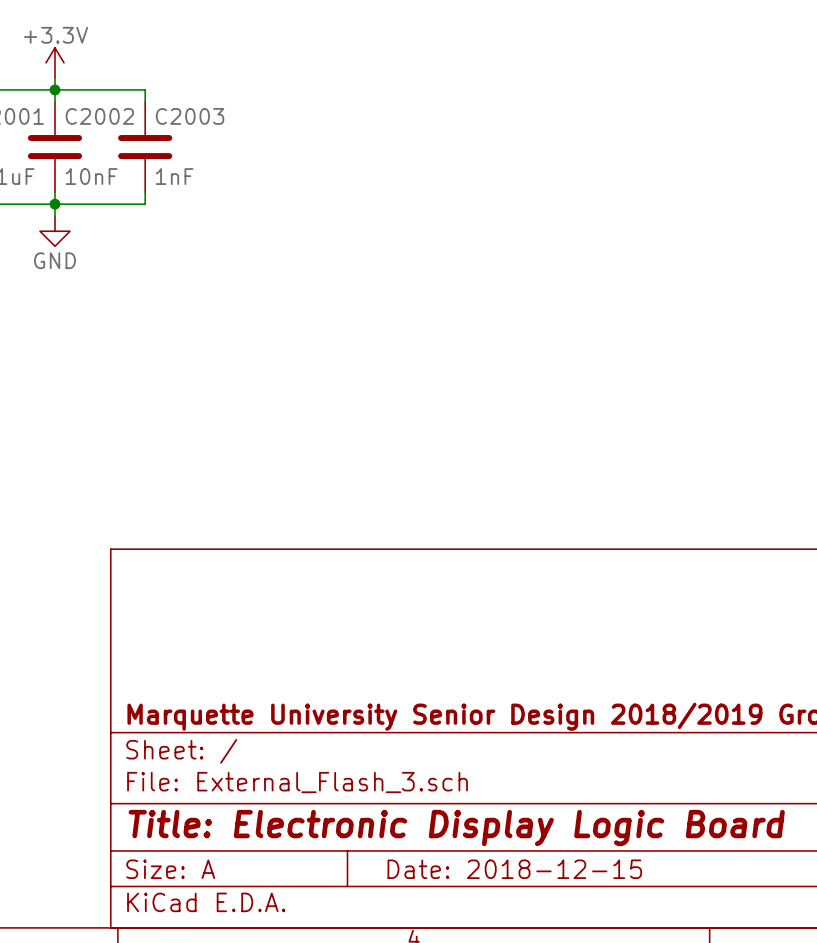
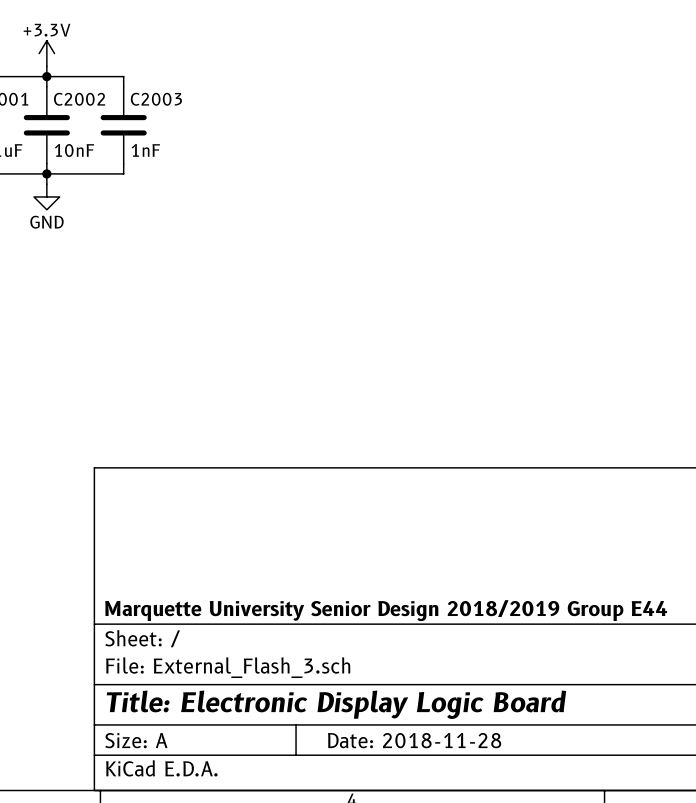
title block: Date: 2018-12-15 (514, 869) -> Date: 2018-11-28 (414, 740)

